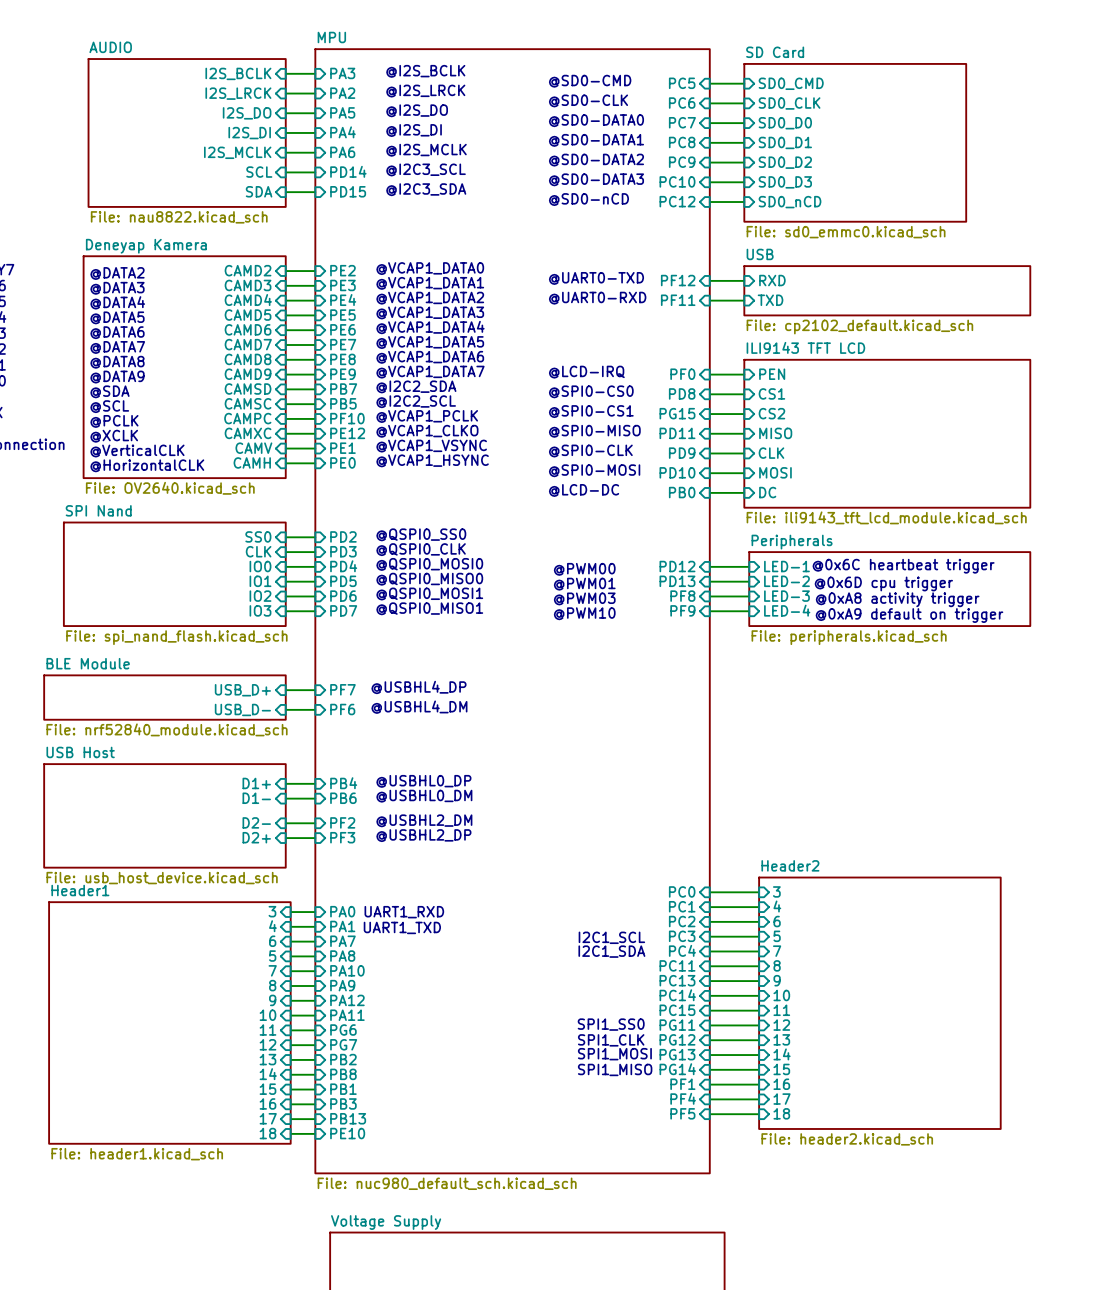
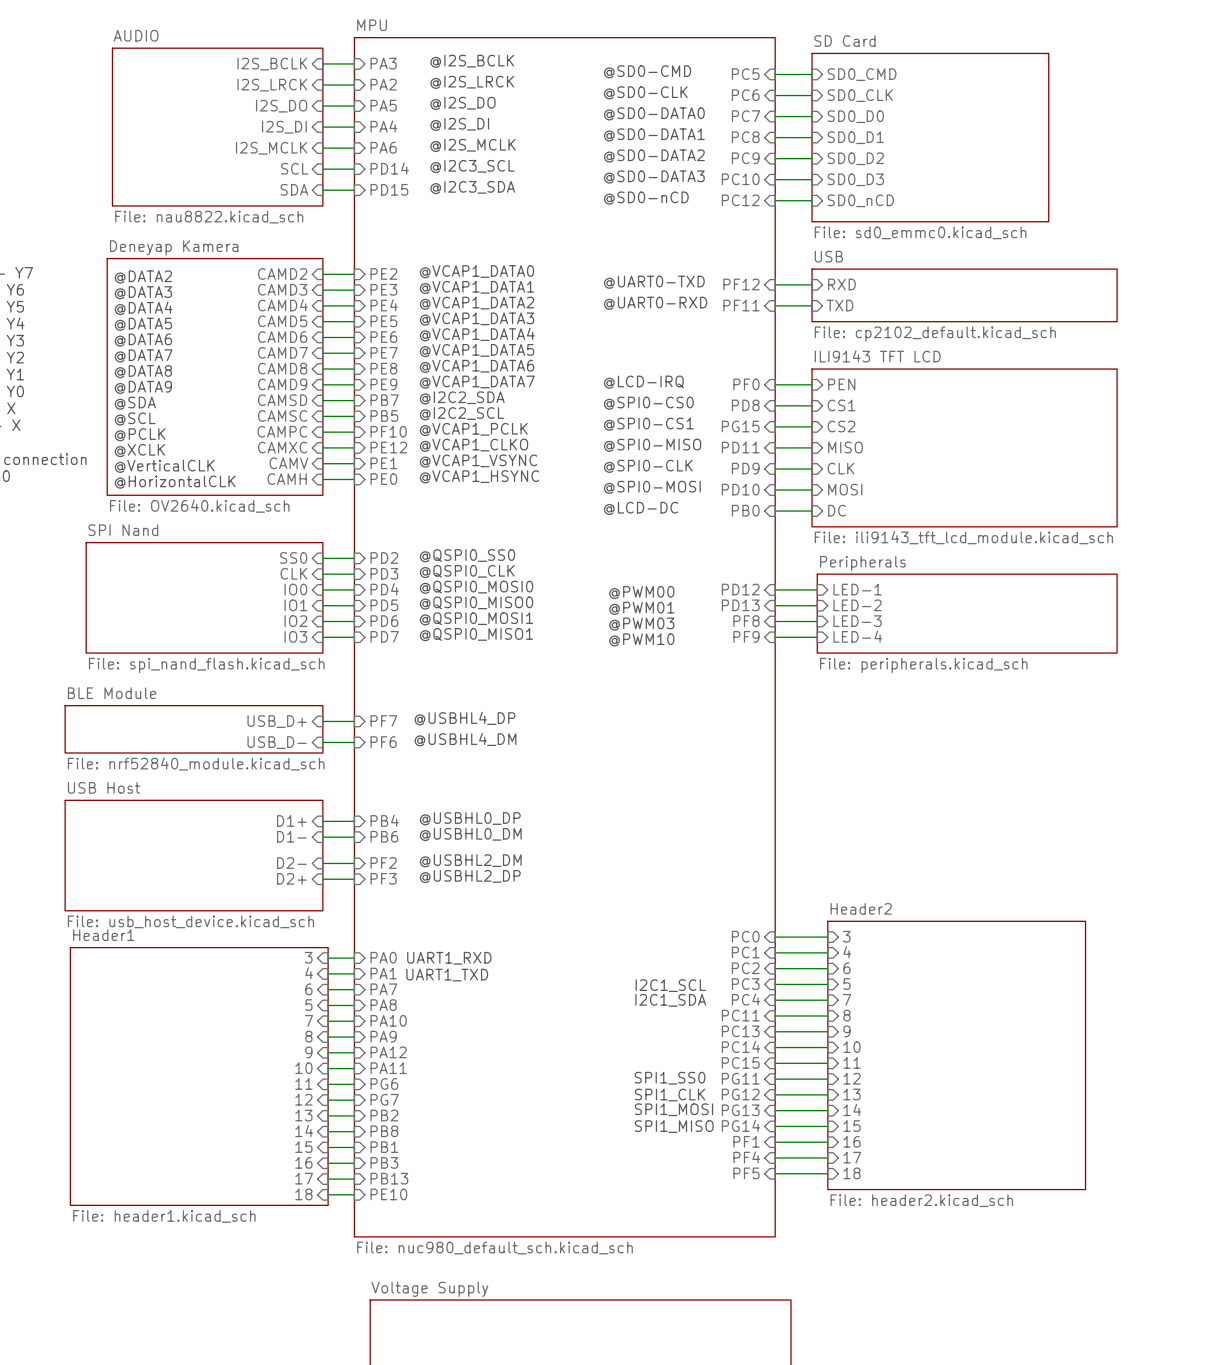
text: @0x6C heartbeat trigger (903, 566) -> none
text: @0x6D cpu trigger (883, 583) -> none
text: @0xA8 activity trigger (897, 599) -> none
text: @0xA9 default on trigger (909, 615) -> none

